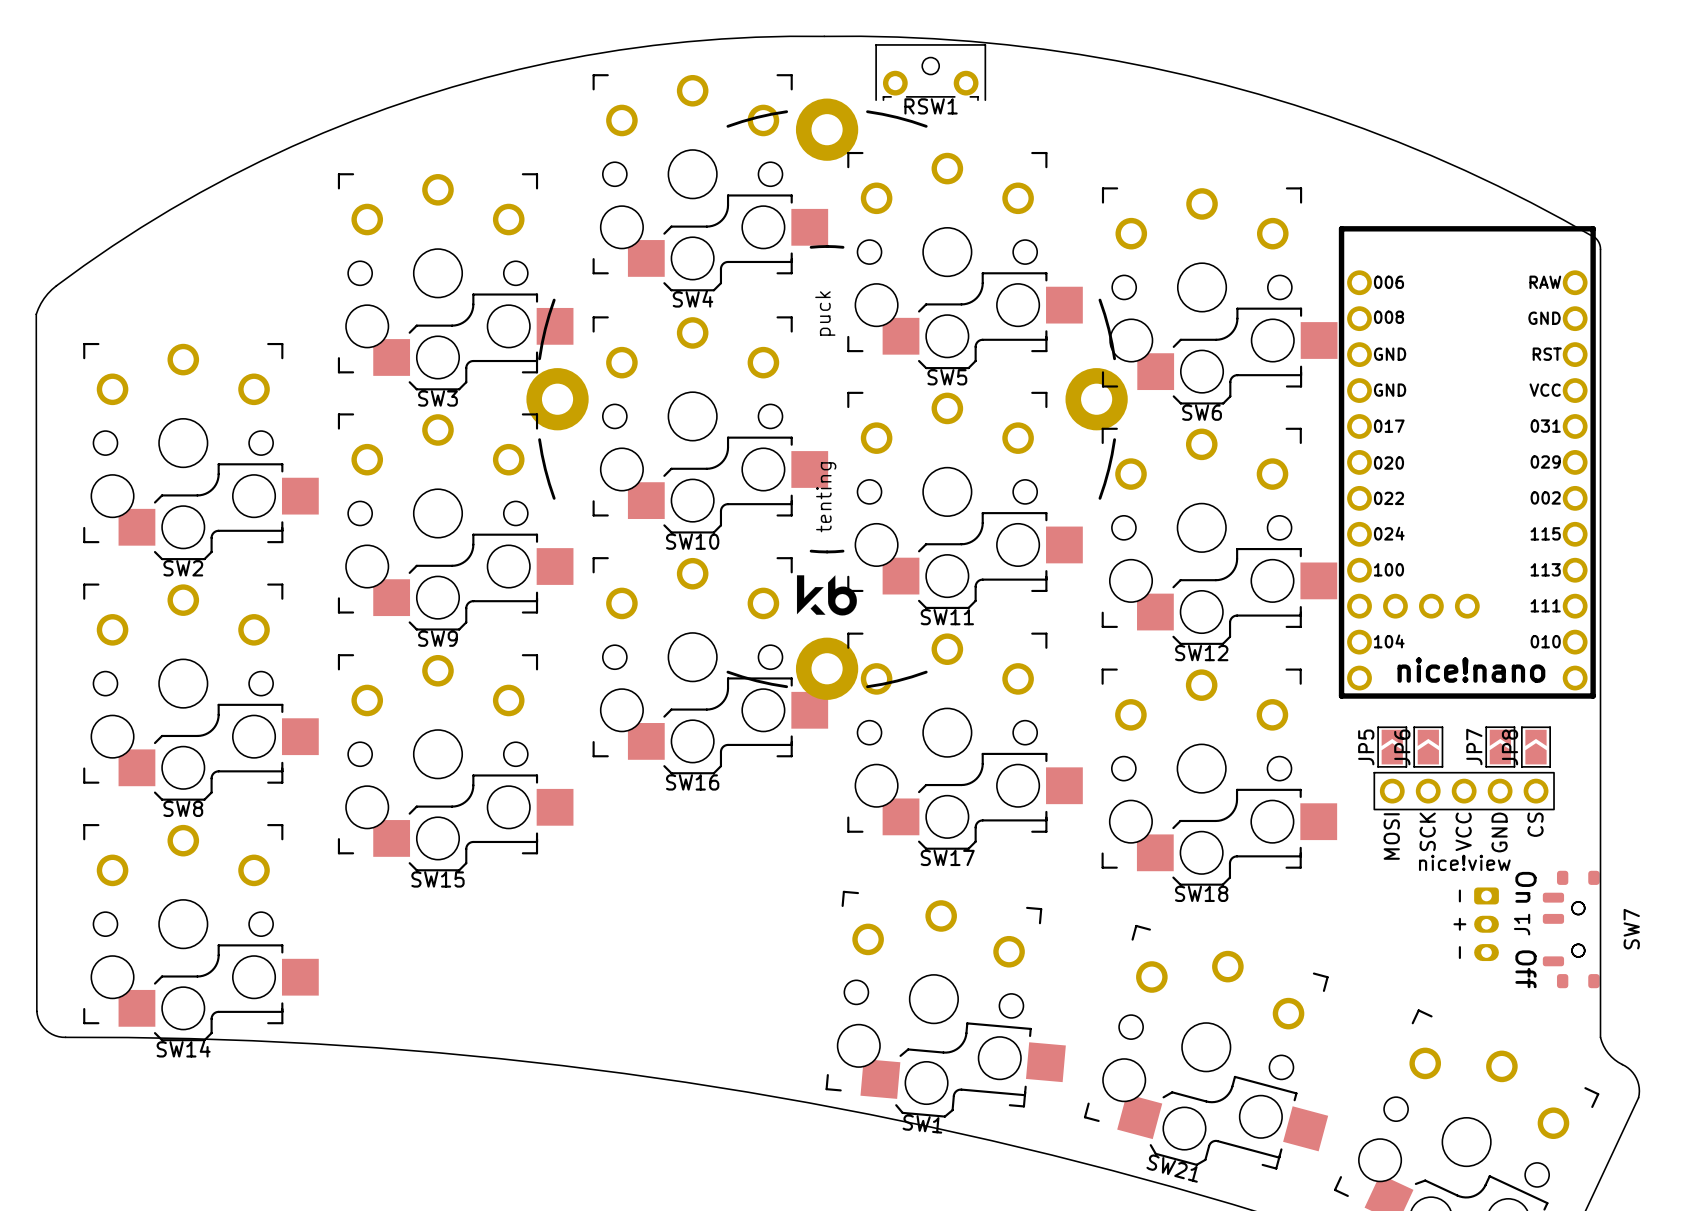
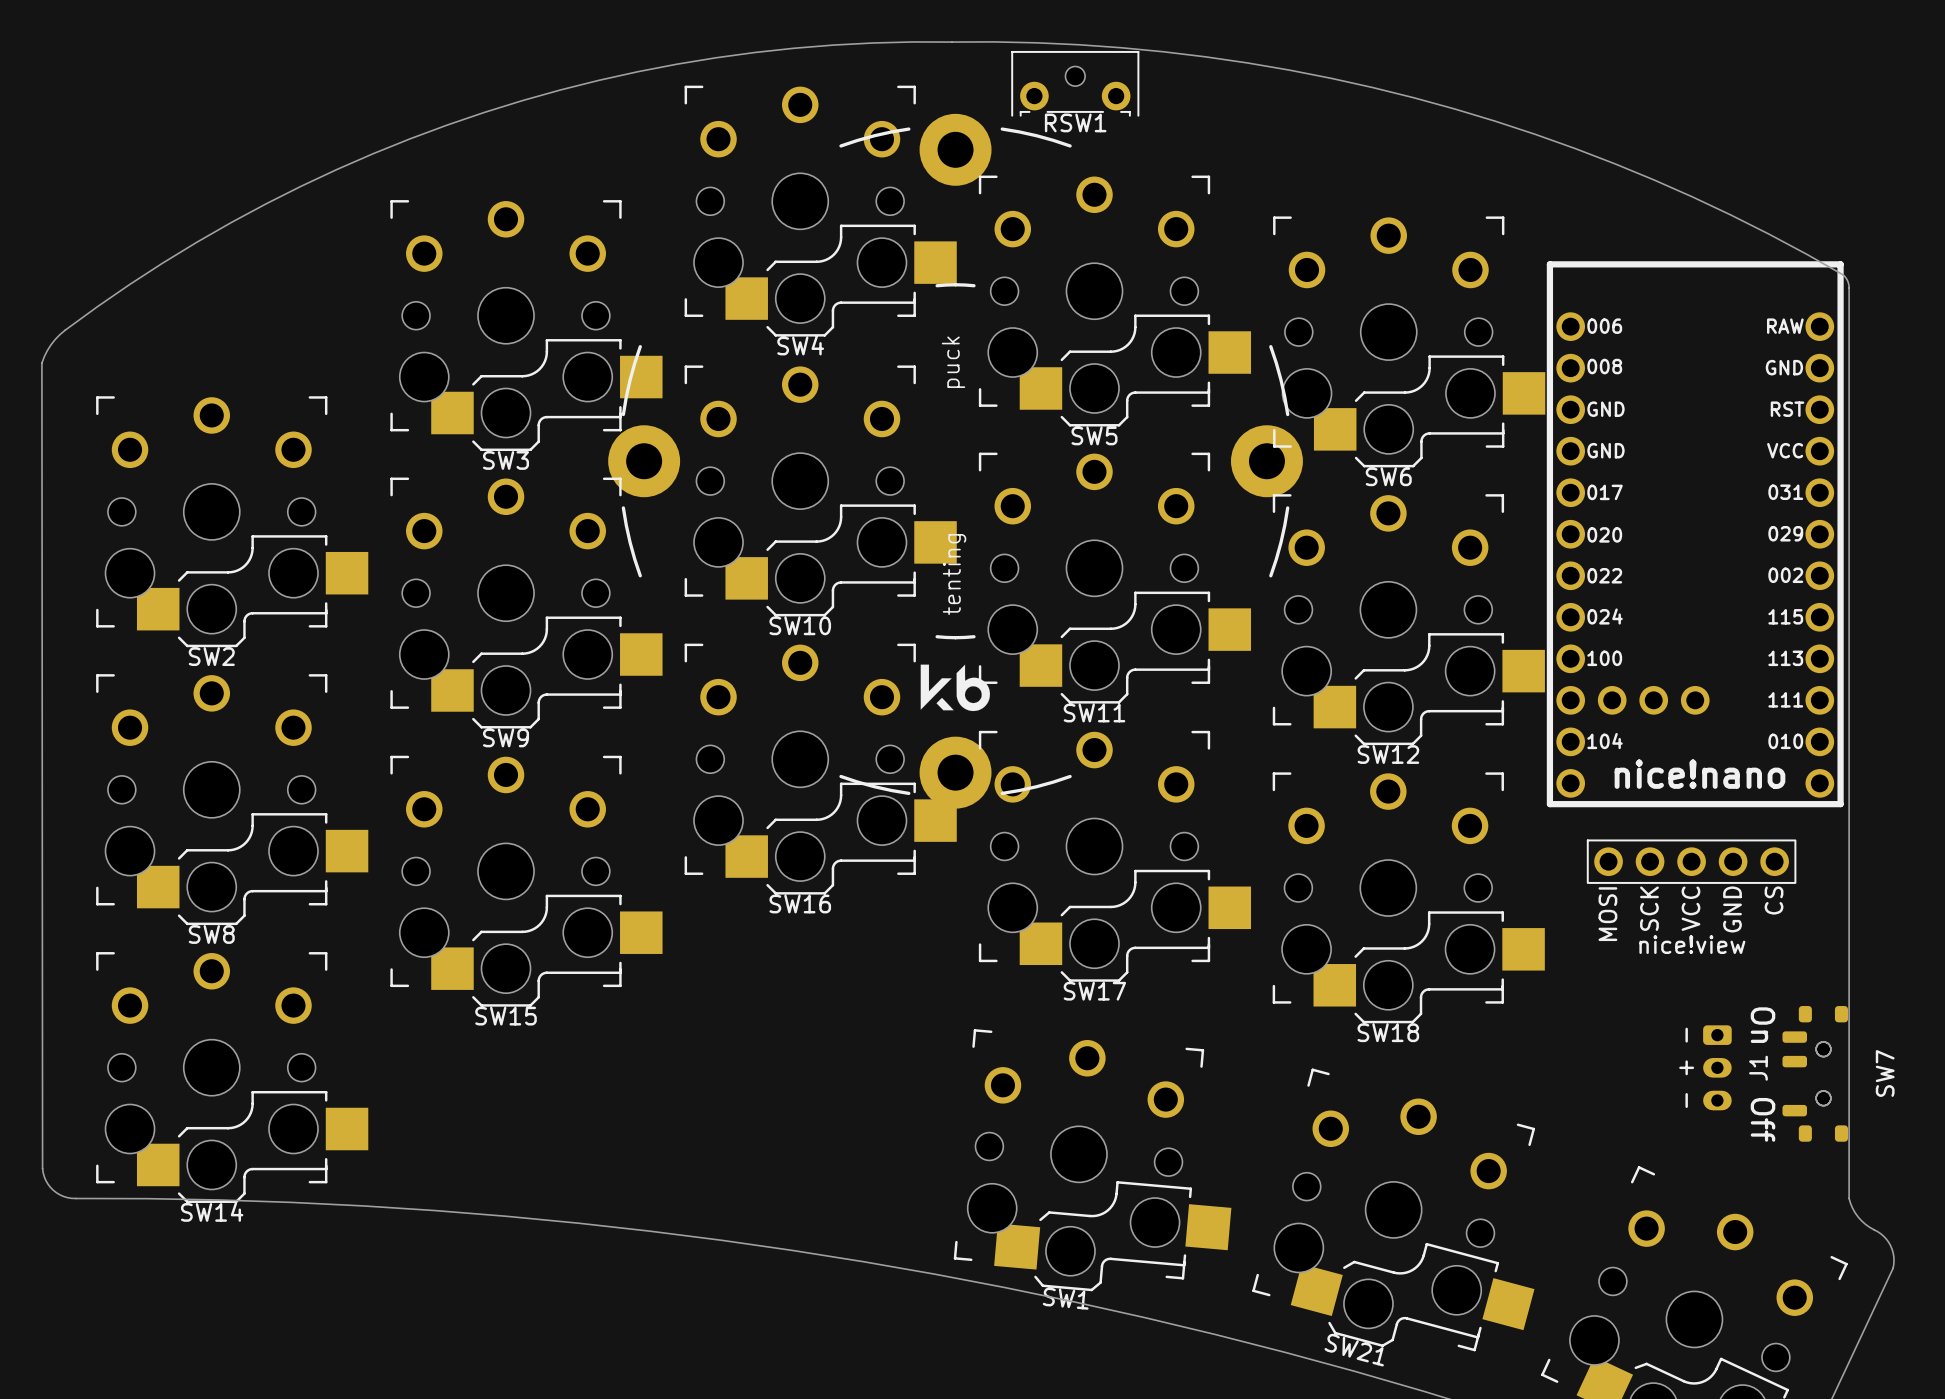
JP5: (1392, 747) -> none
JP6: (1428, 747) -> none
JP7: (1500, 747) -> none
JP8: (1535, 747) -> none
part position: (1464, 791) -> (1691, 861)

